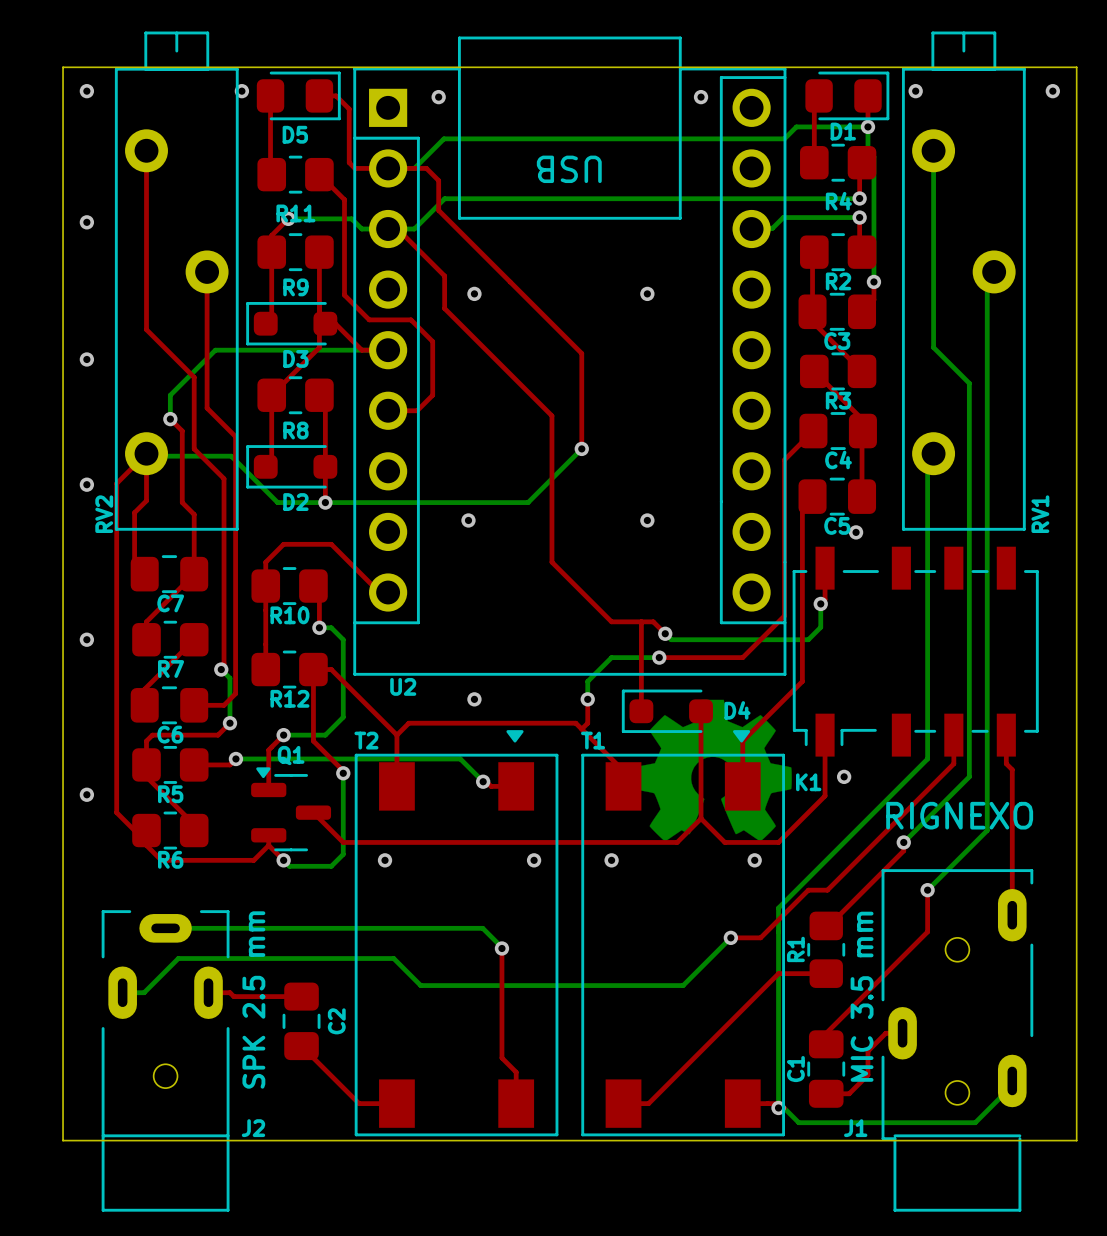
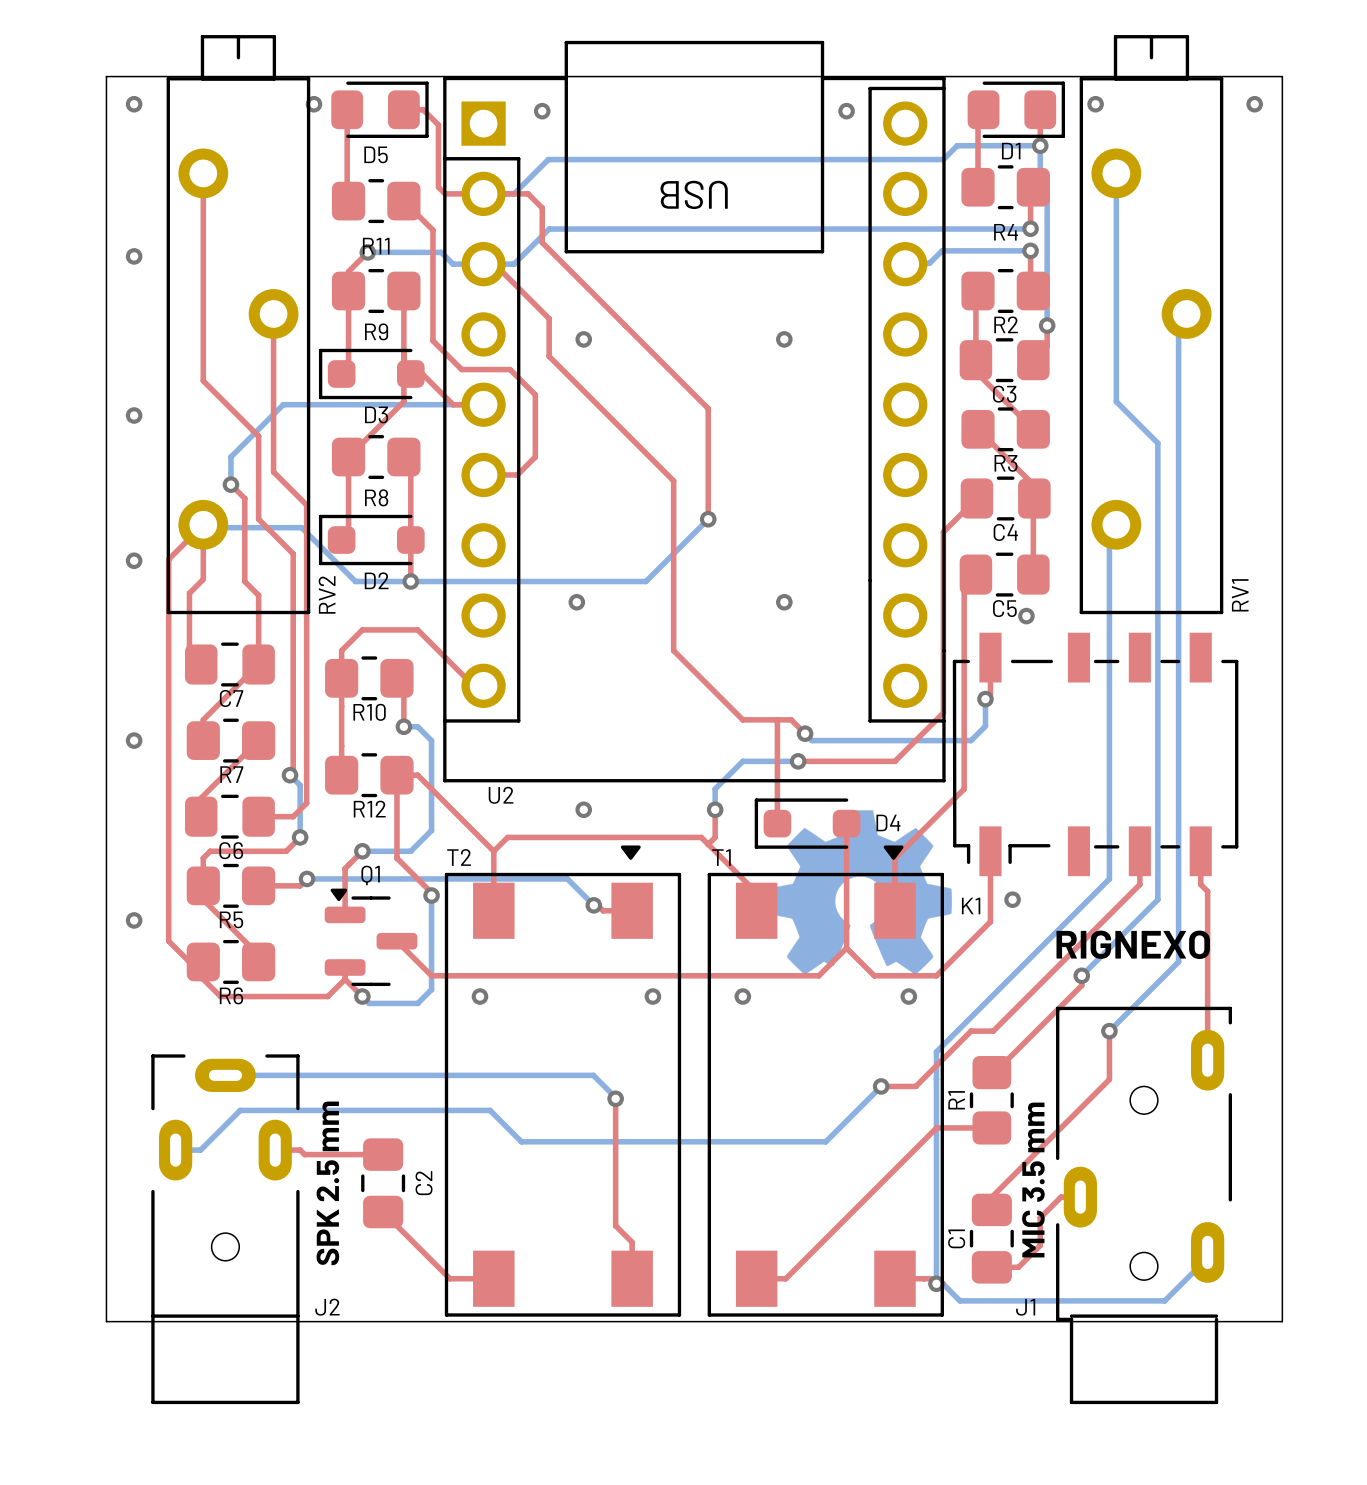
RV2 name position: RV2 (104, 514) -> RV2 (327, 594)

